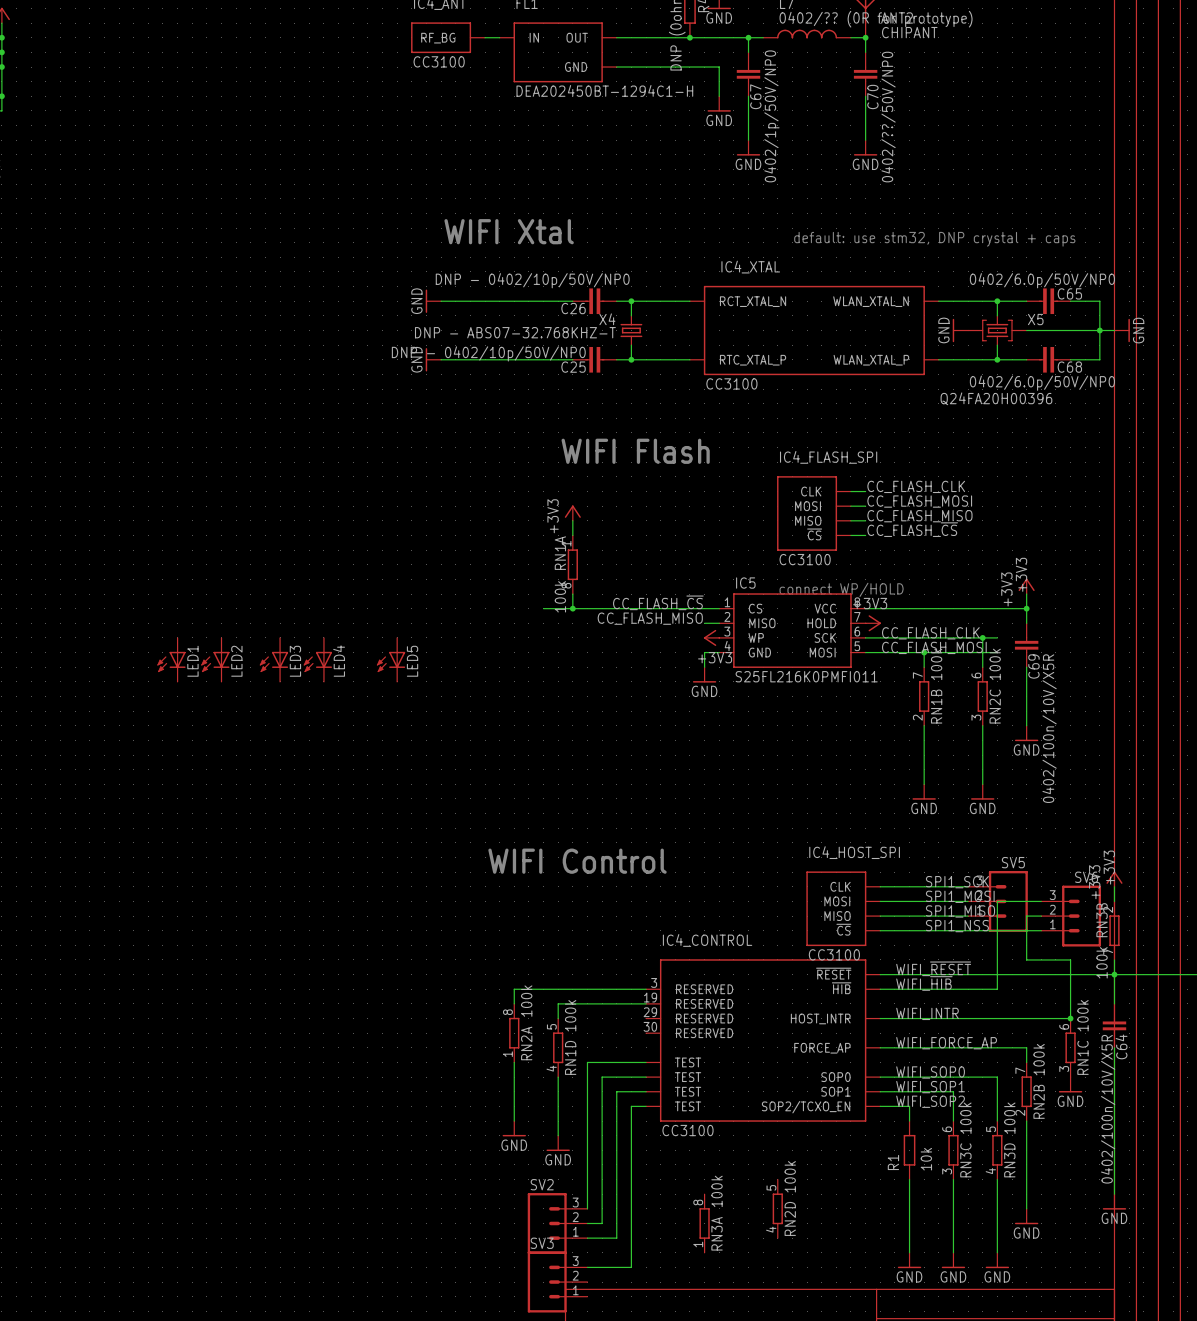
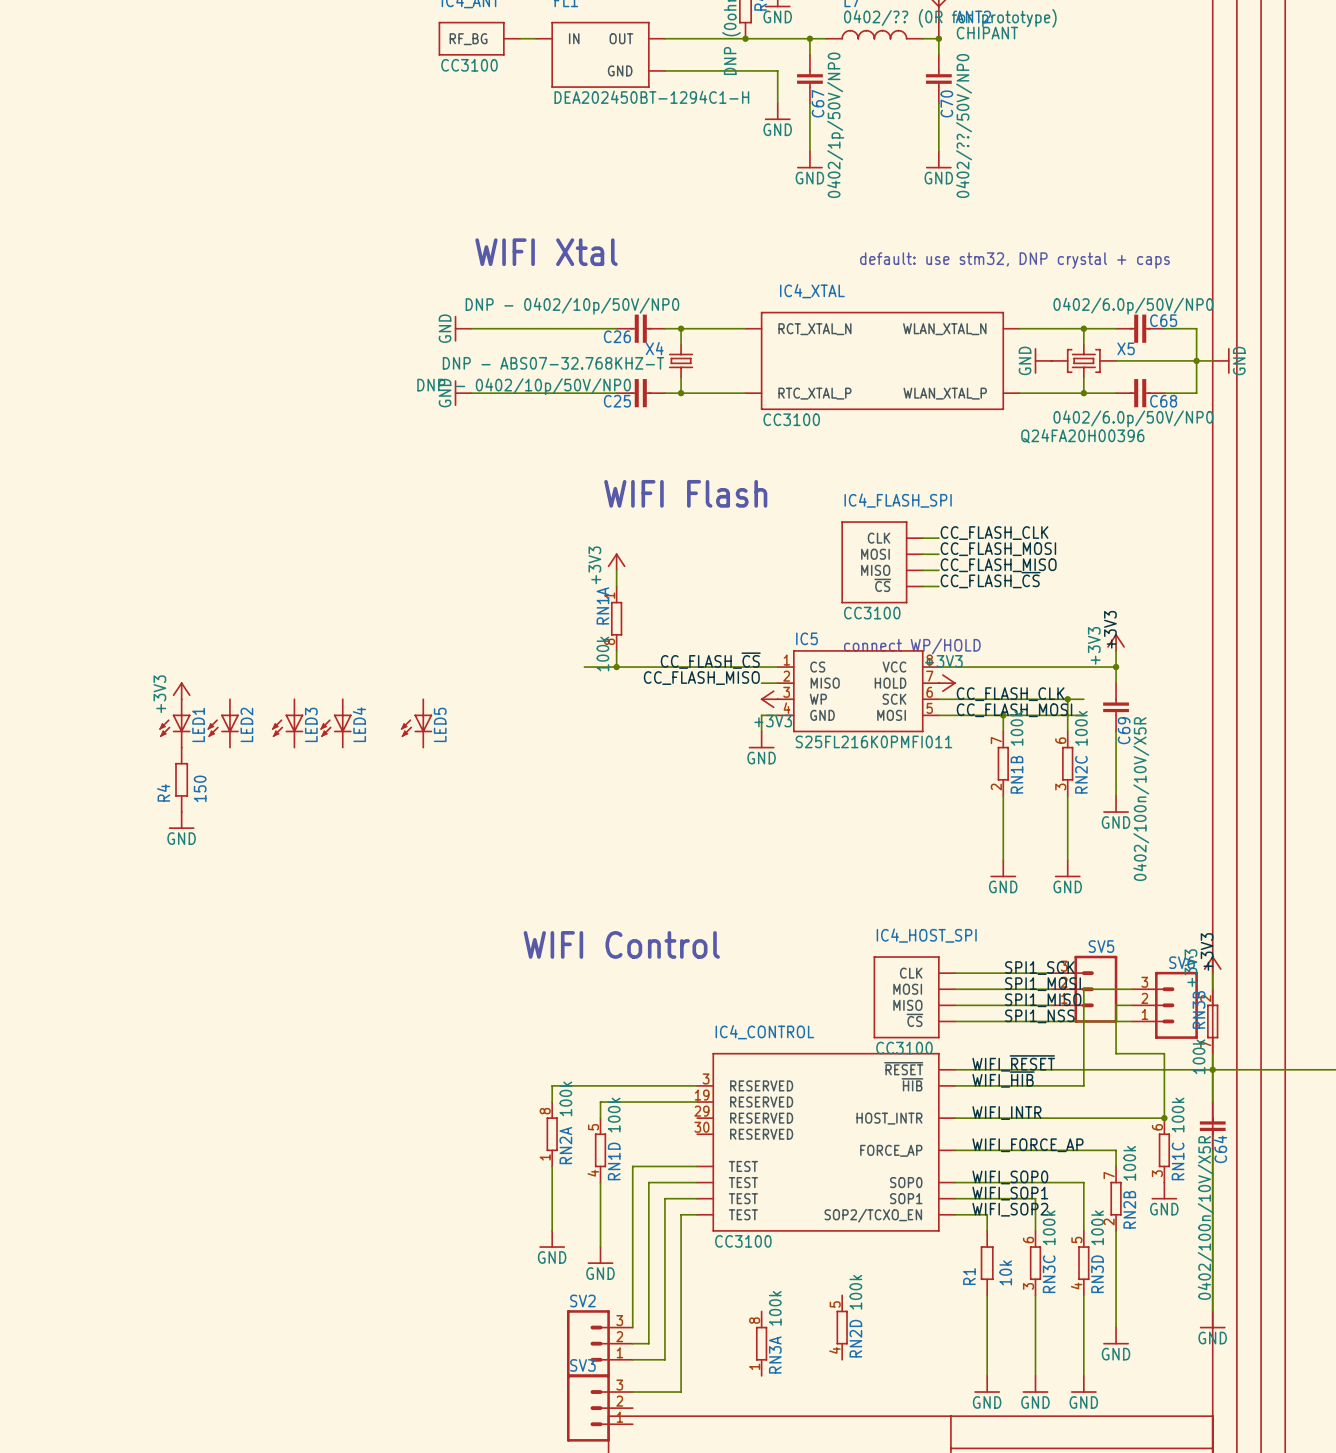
power symbol: none -> +3V3 (181, 690)
R4: none -> 150 (181, 779)
power symbol: none -> GND (181, 820)

